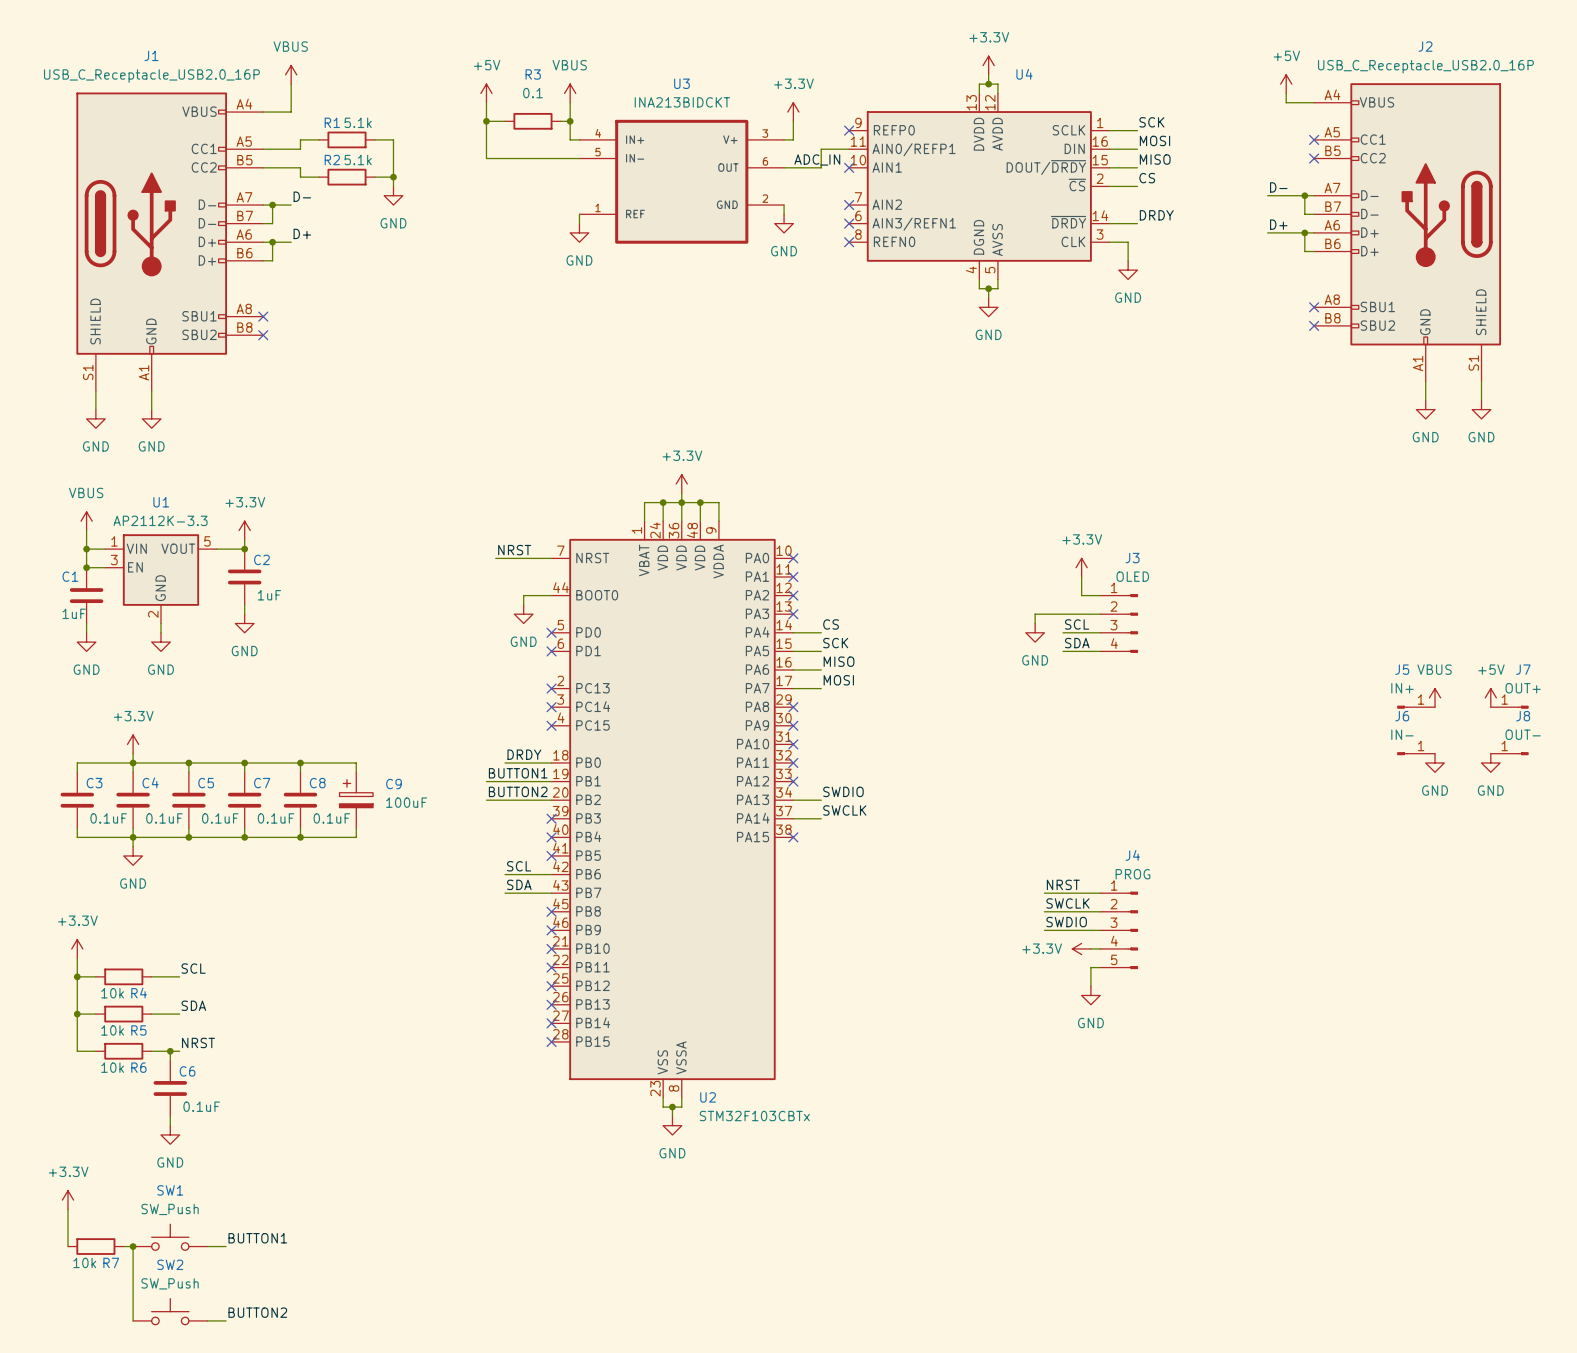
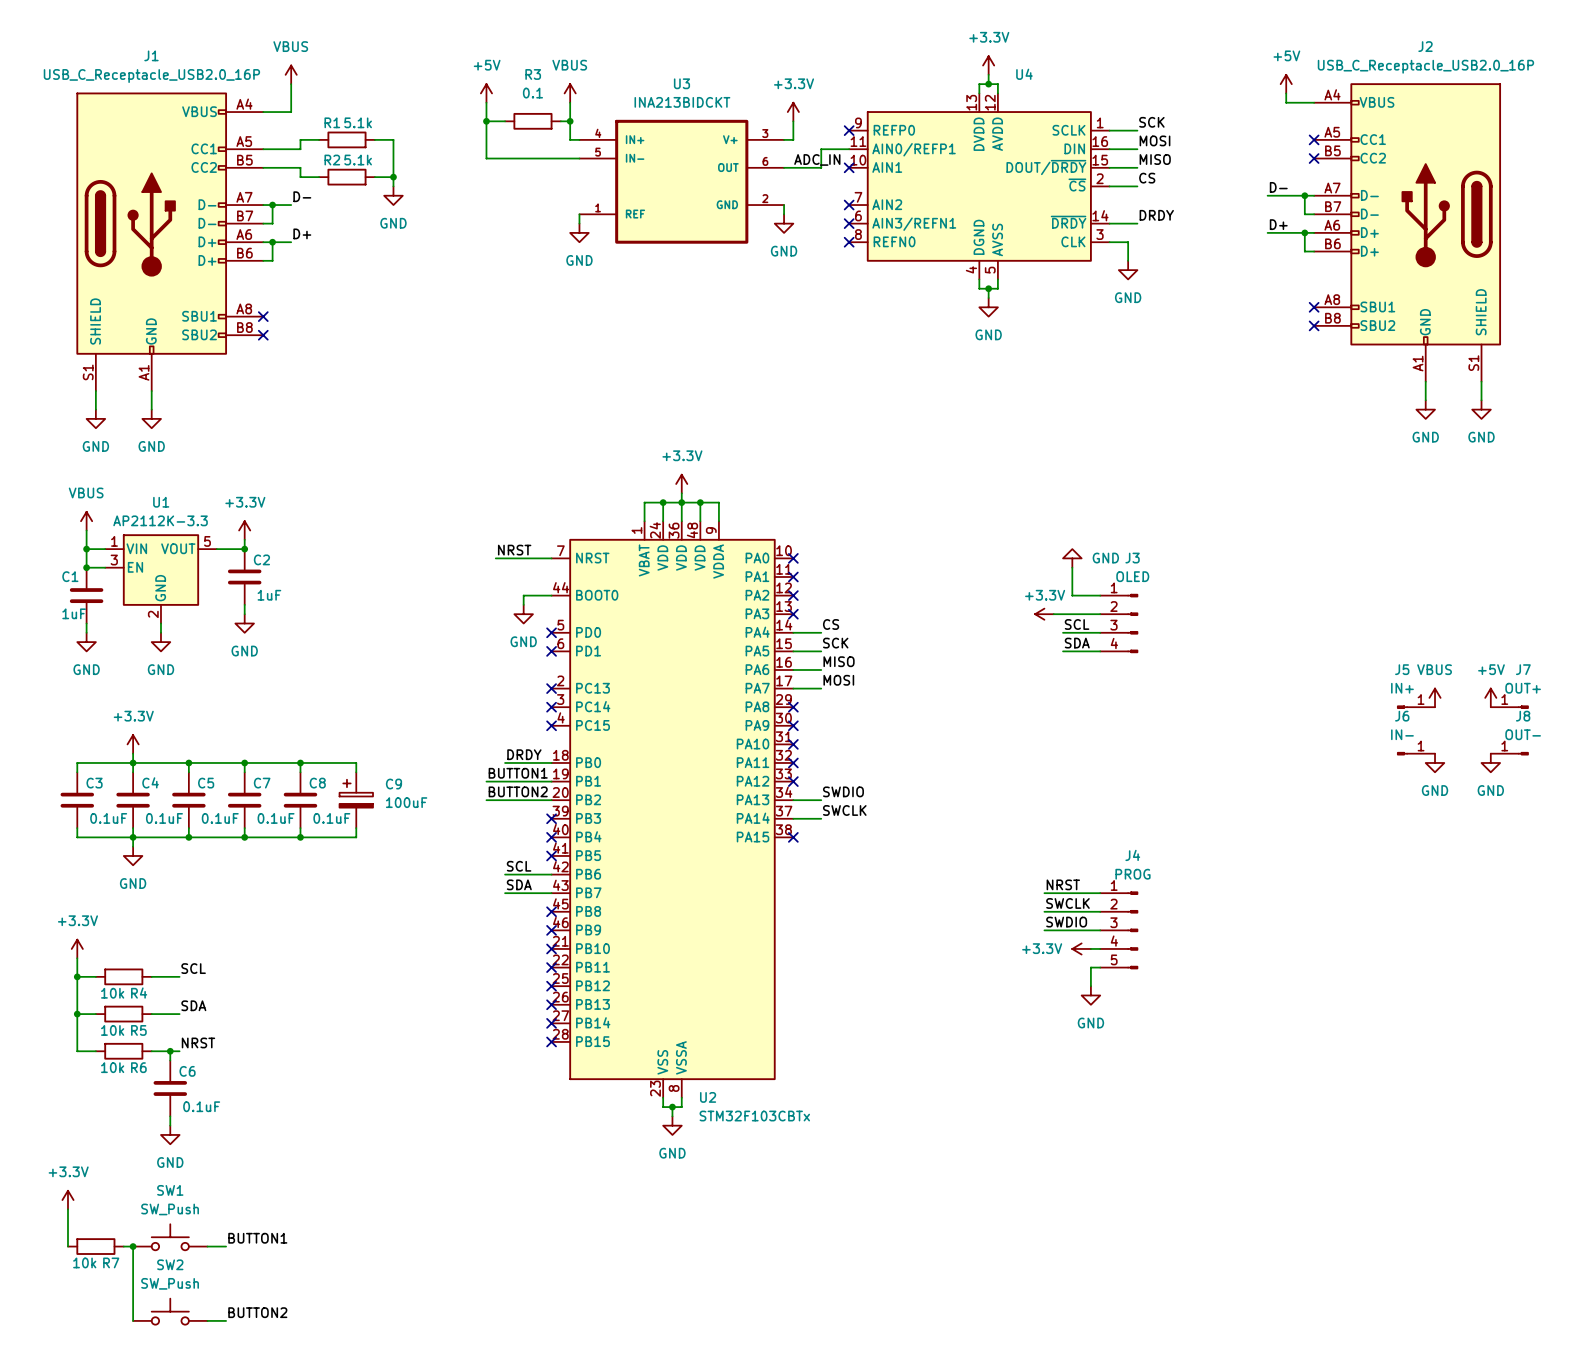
power symbol rotation: 0° (1081, 567) -> 90° counterclockwise (1044, 614)
power symbol position: +3.3V (1081, 567) -> +3.3V (1044, 614)
wire: (1081, 577) (1081, 595) -> (1072, 567) (1072, 595) (1081, 595)
power symbol rotation: 0° (1035, 632) -> 180° (1072, 558)
power symbol position: GND (1035, 632) -> GND (1072, 558)
power symbol text position: GND (1035, 660) -> GND (1105, 558)

